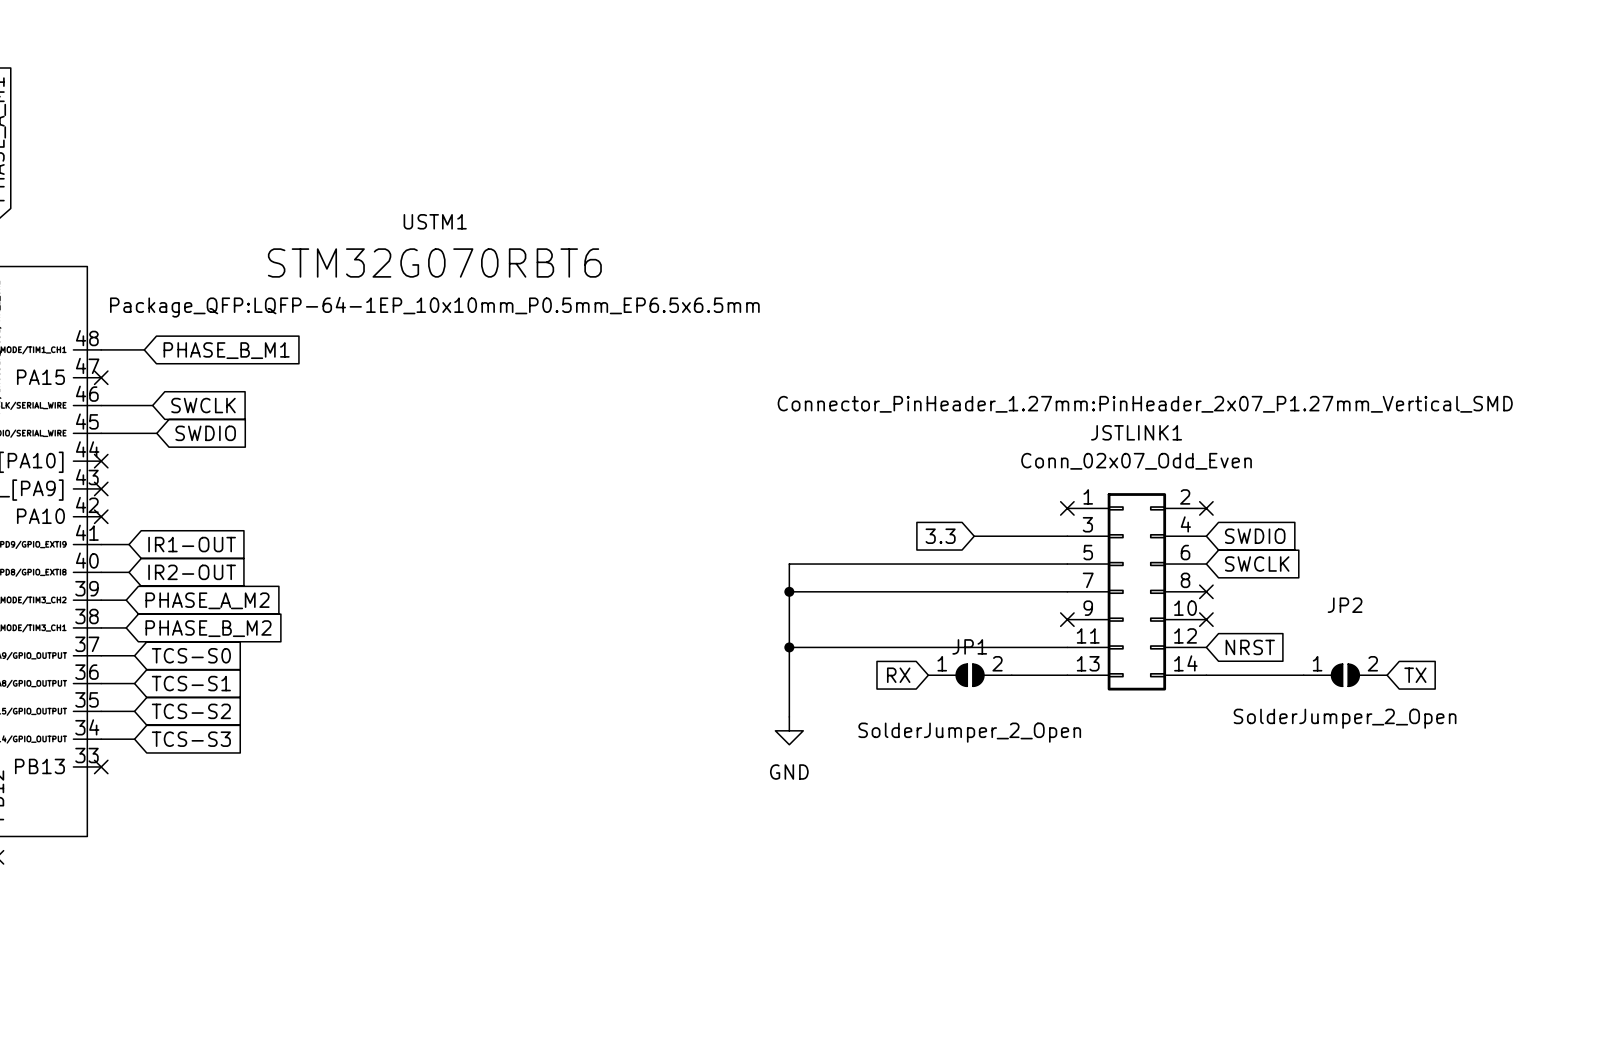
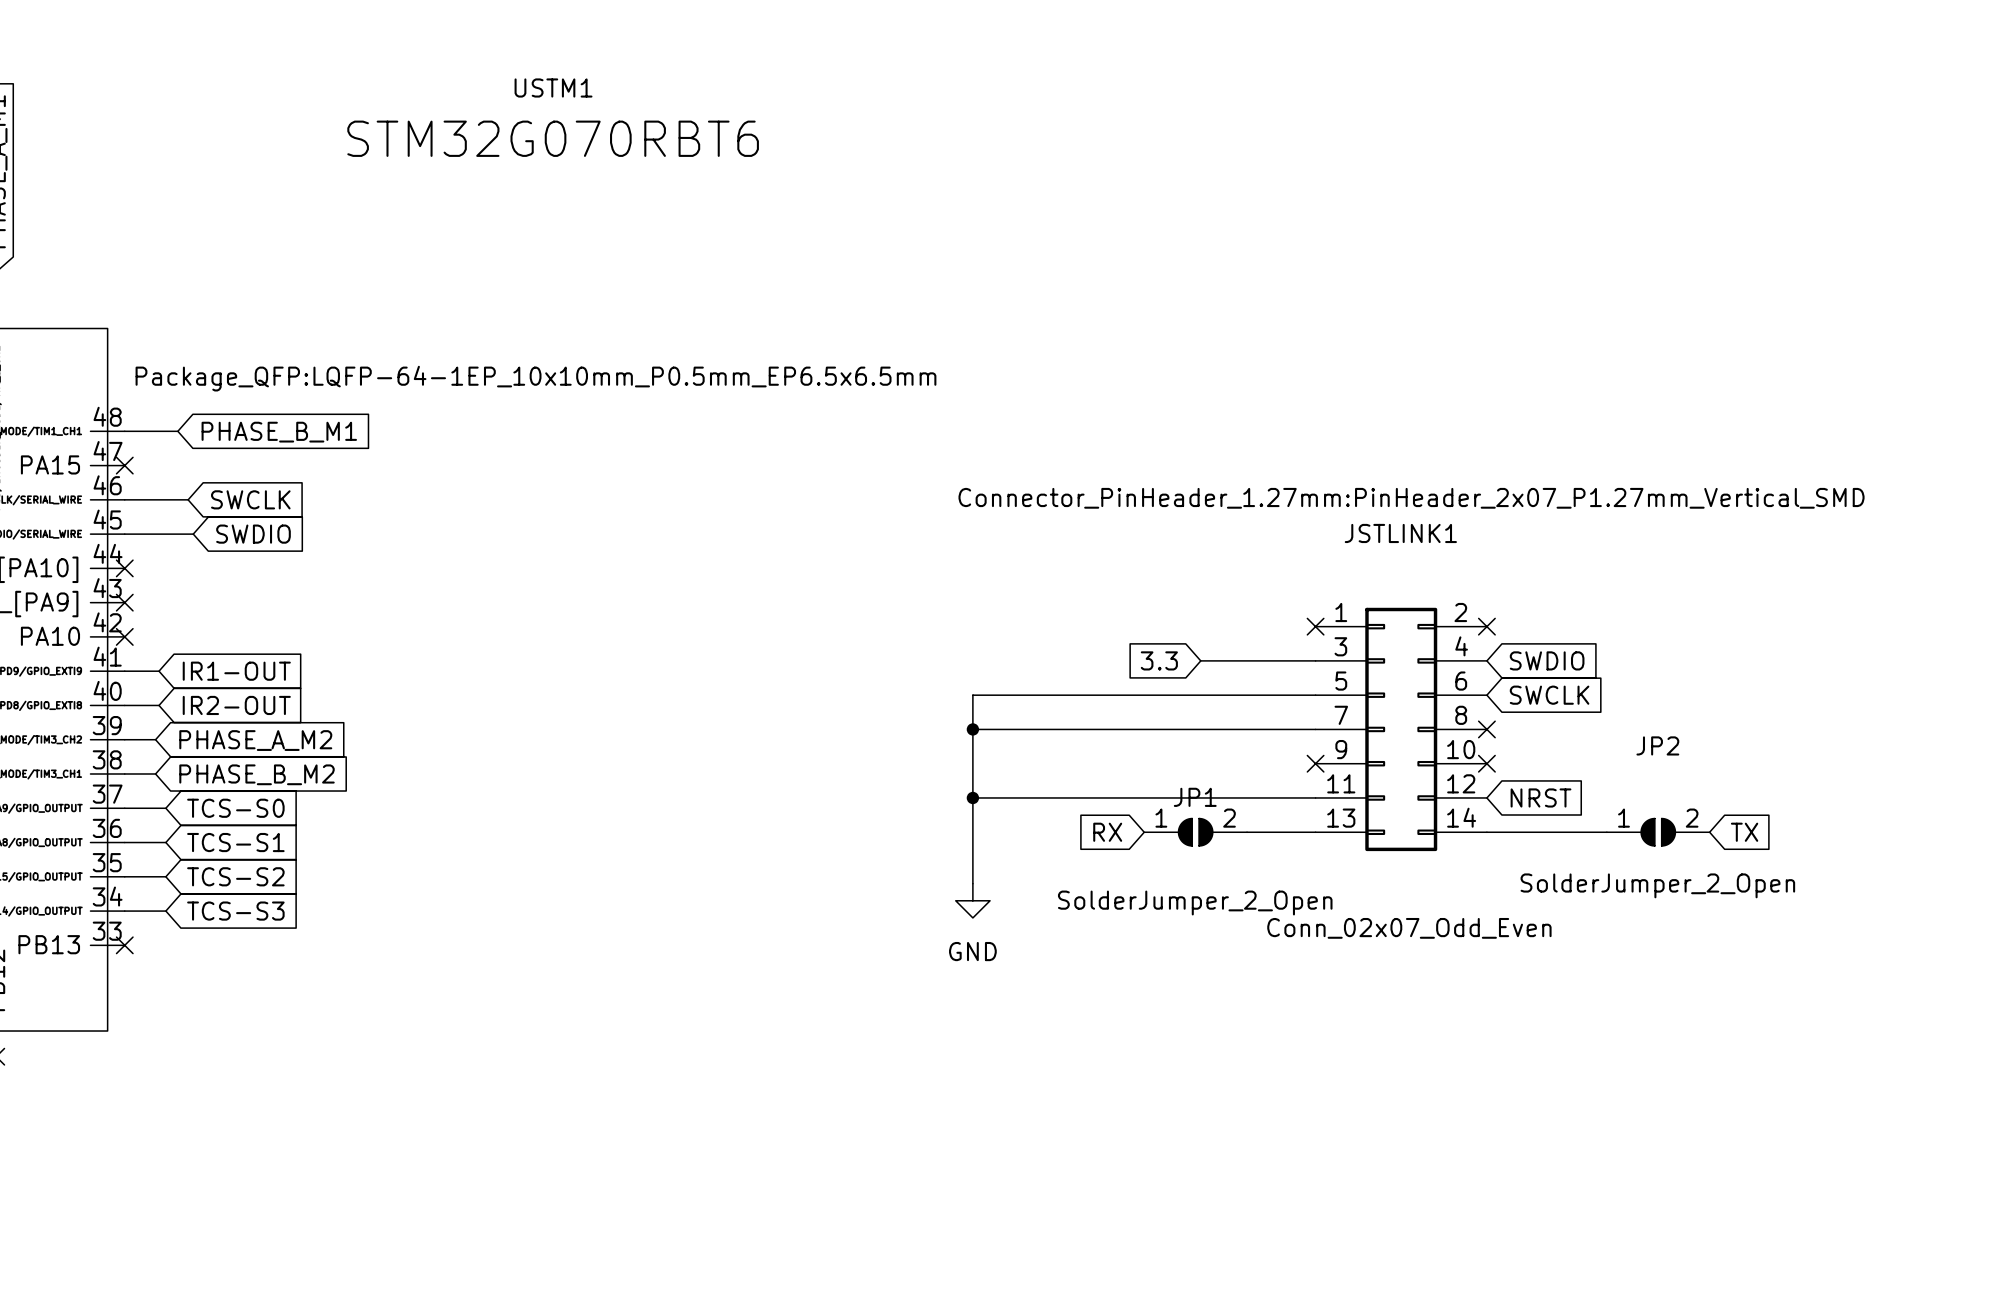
USTM1 name position: USTM1 (435, 221) -> USTM1 (553, 87)
USTM1 value position: STM32G070RBT6 (434, 262) -> STM32G070RBT6 (553, 138)
JSTLINK1 value position: Conn_02x07_Odd_Even (1136, 461) -> Conn_02x07_Odd_Even (1409, 928)

